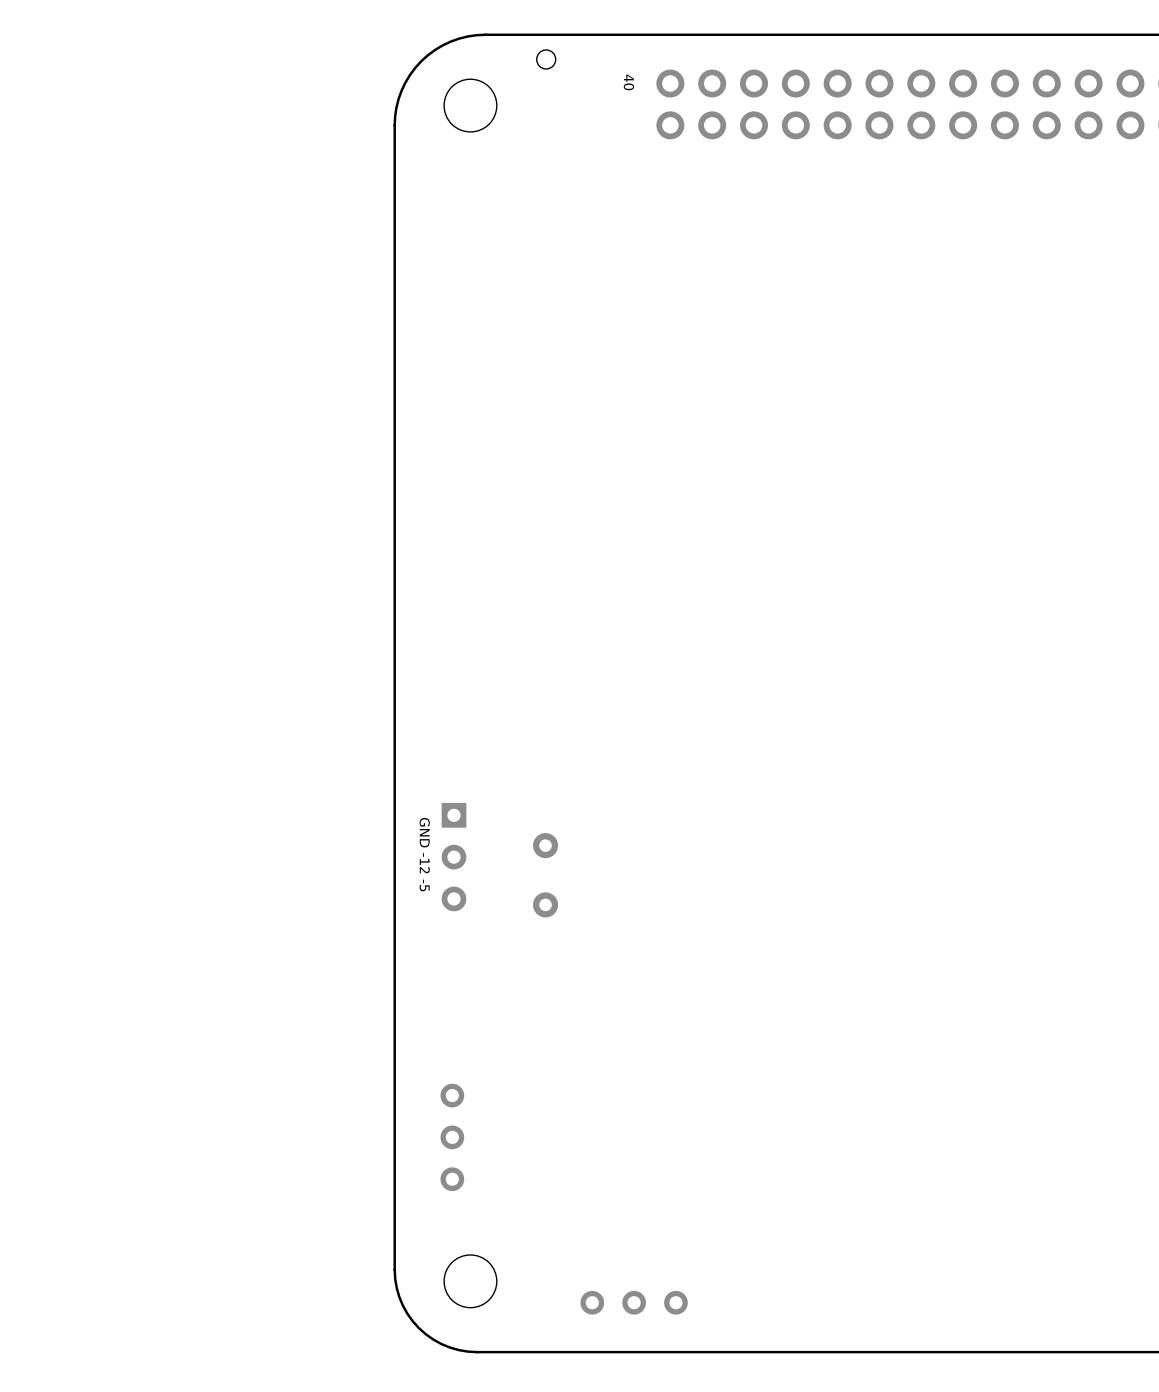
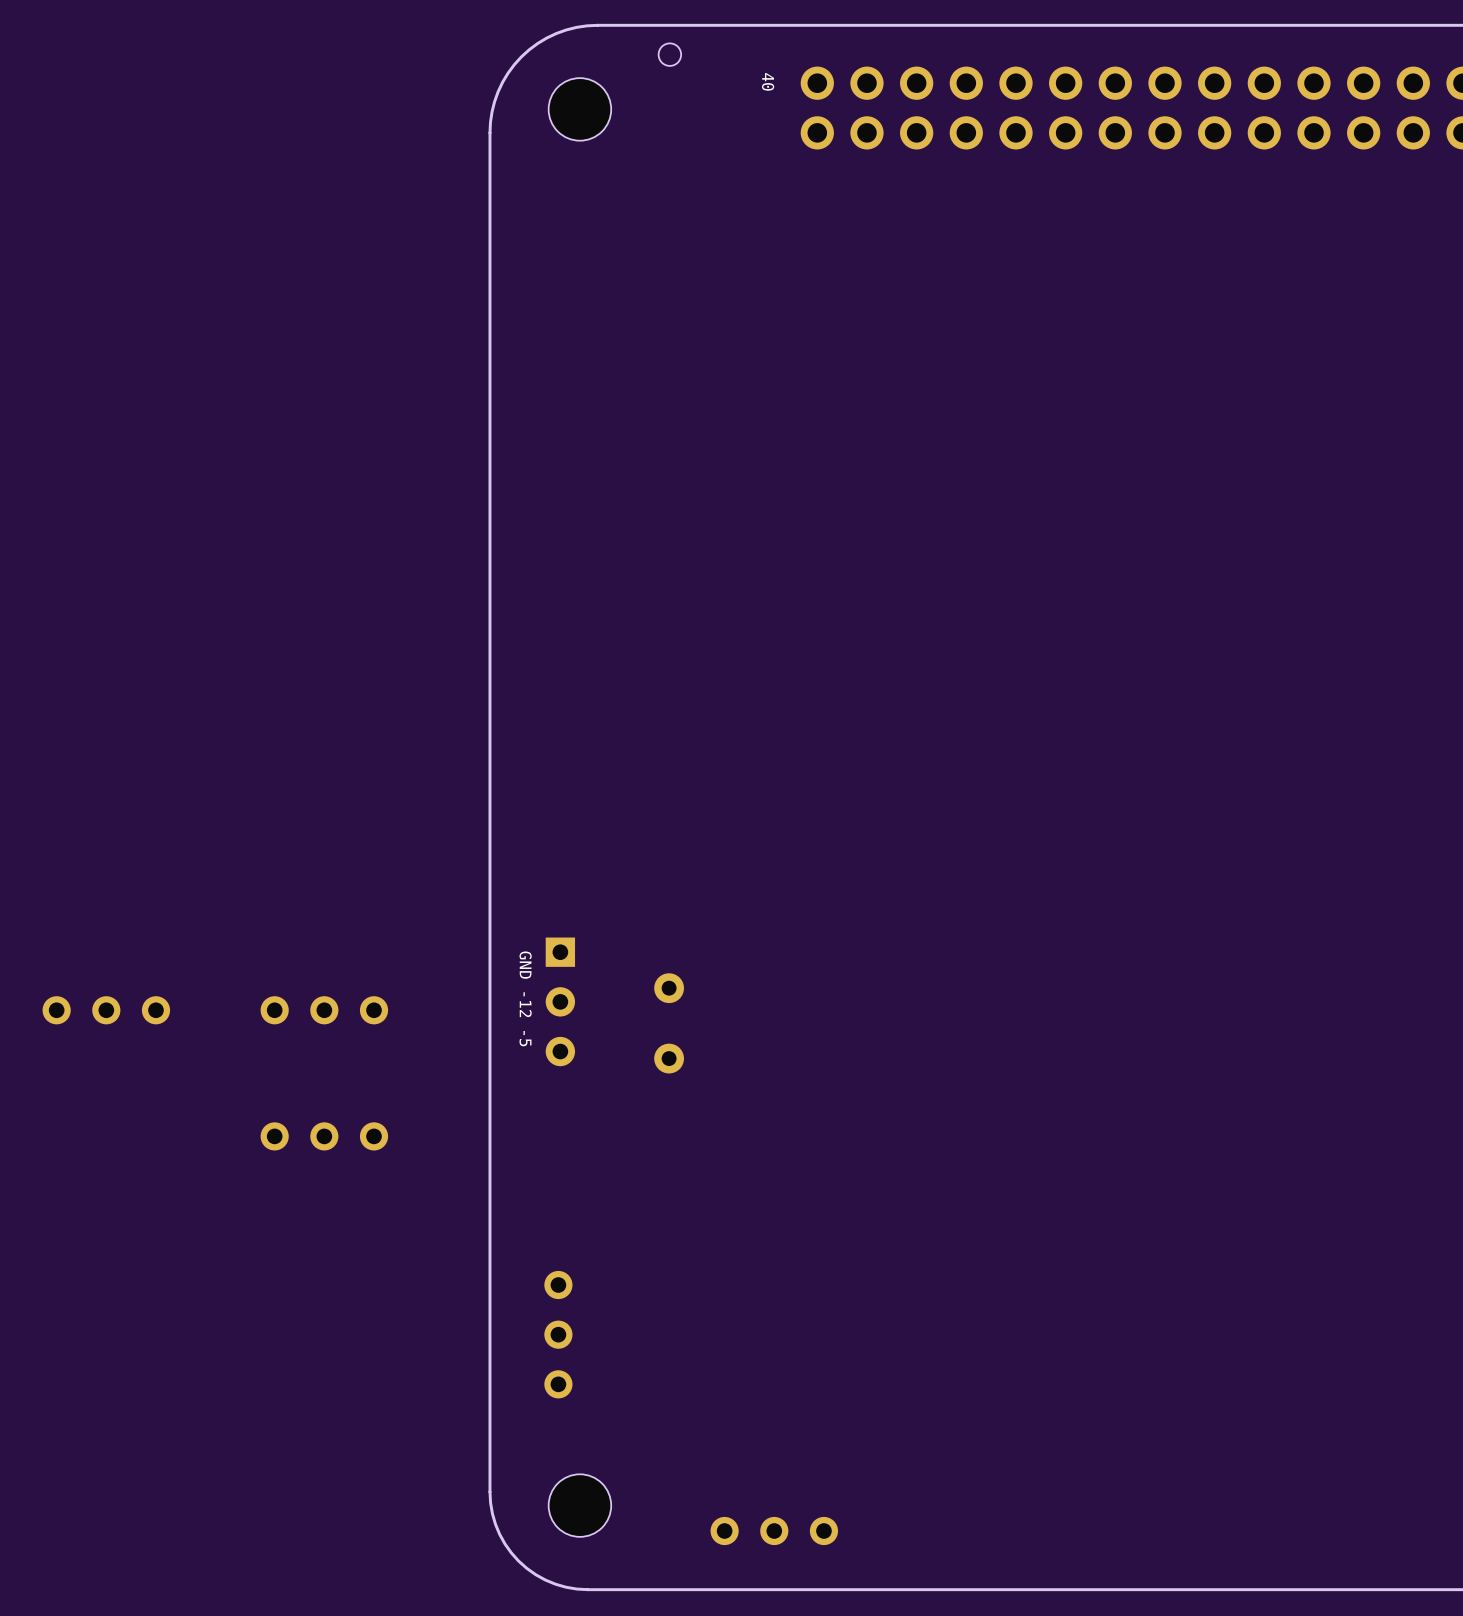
part: none -> (106, 1010)
part: none -> (324, 1010)
part: none -> (324, 1136)

